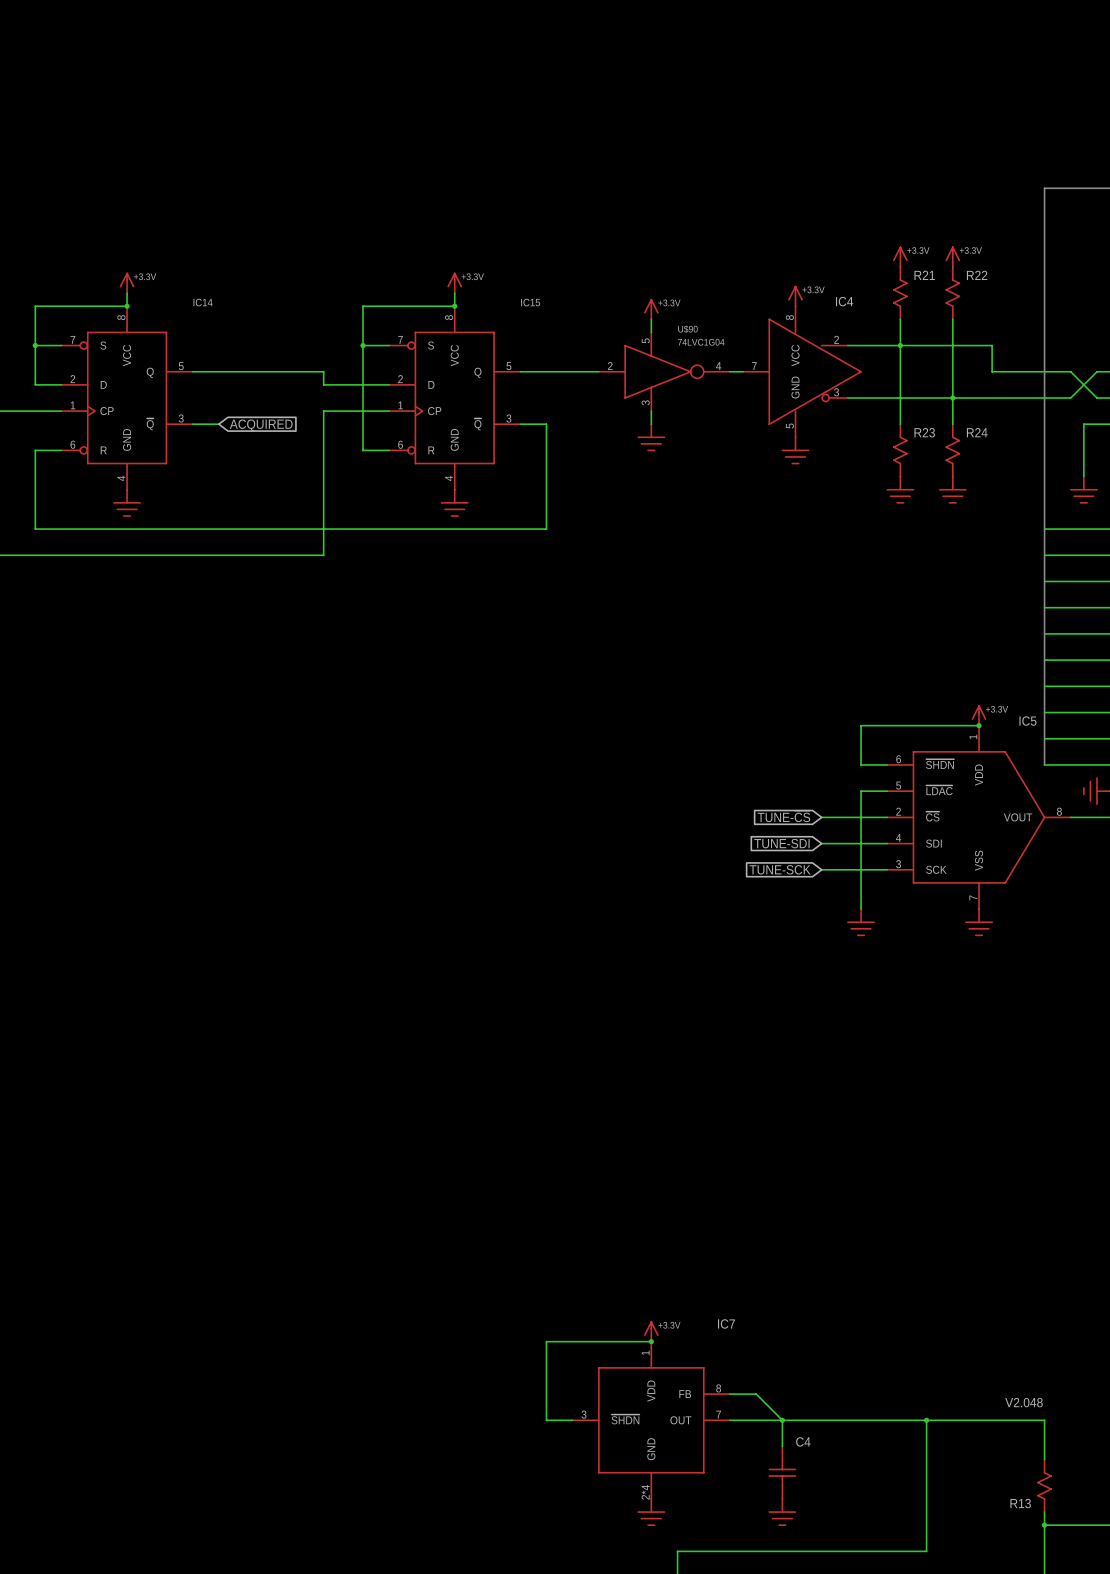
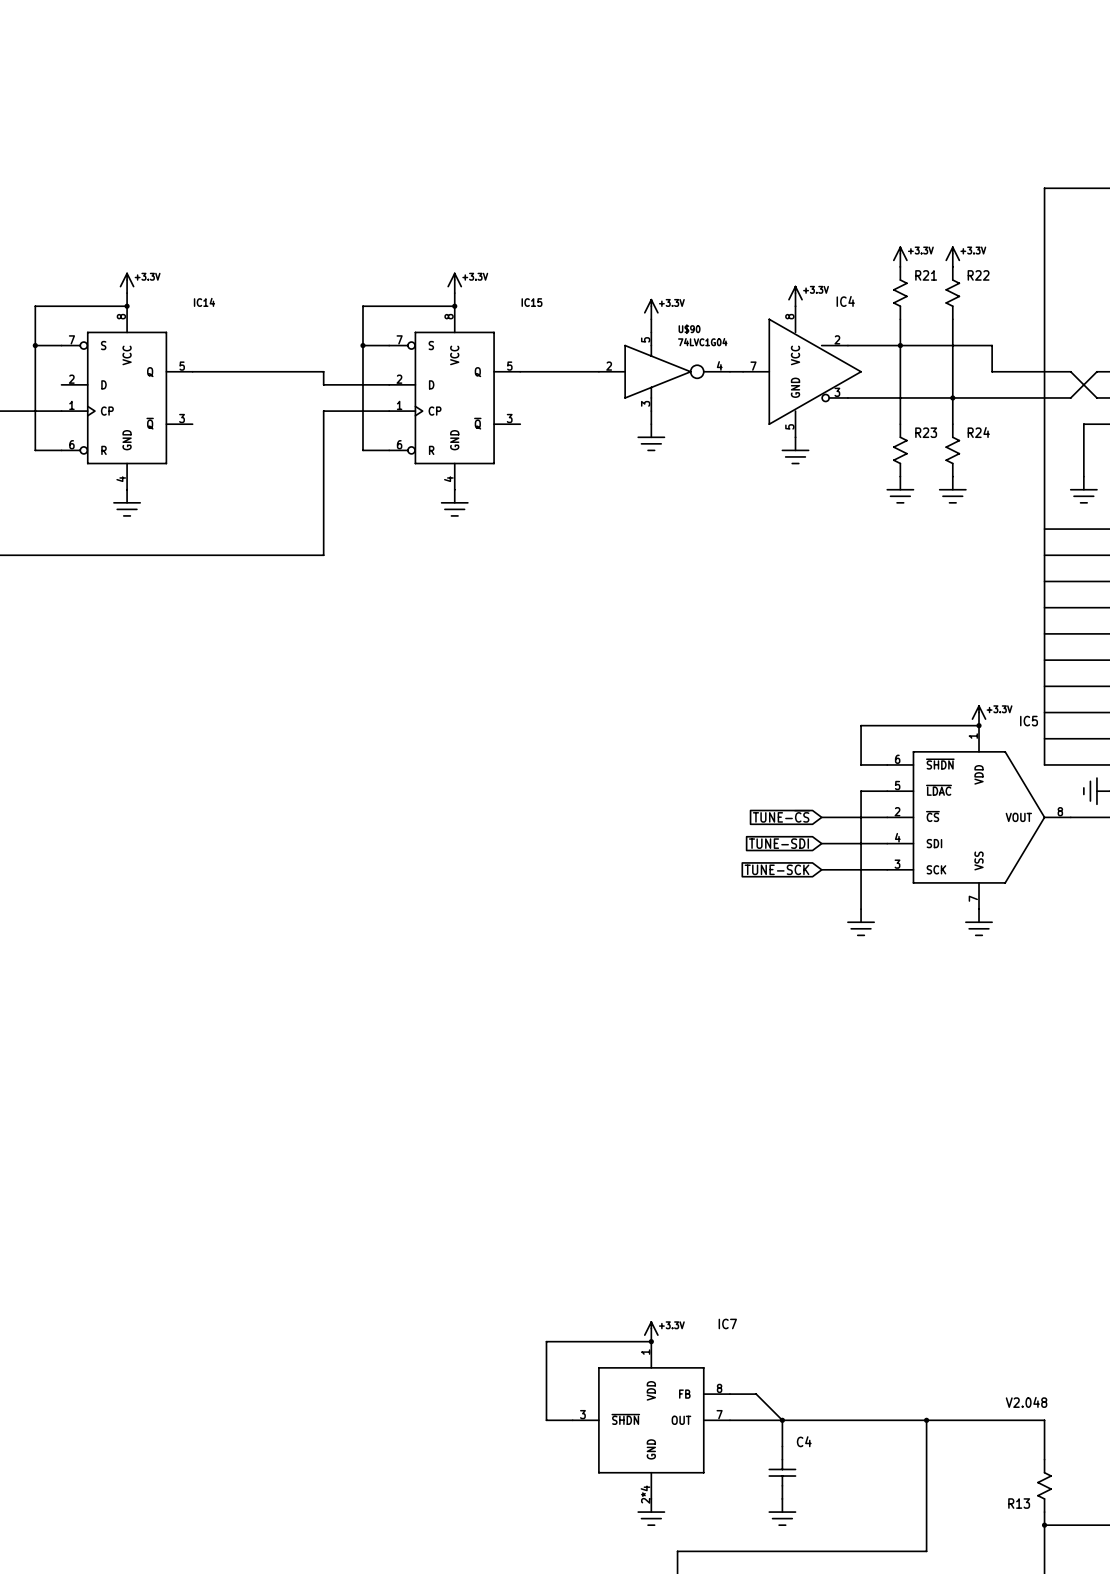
wire: (35, 384) (61, 384) -> (35, 384) (35, 450)
wire: (192, 424) (218, 424) -> none
wire: (520, 424) (546, 424) (546, 529) (35, 529) (35, 450) -> none
global label: ACQUIRED (261, 425) -> none

